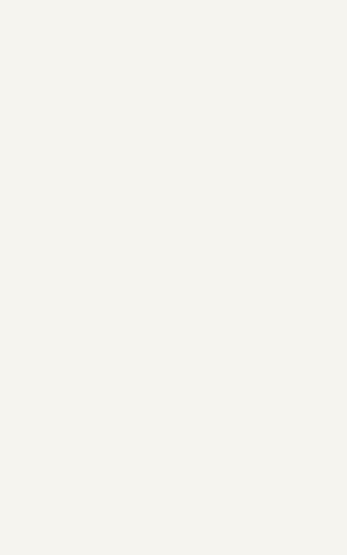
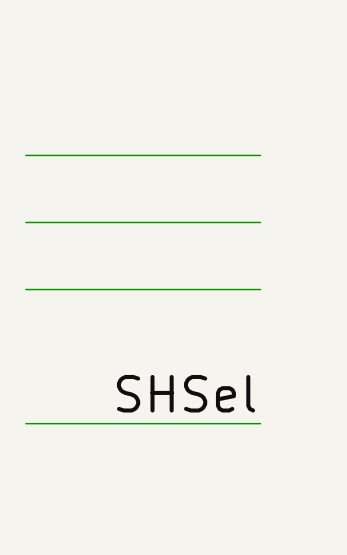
wire: none -> (25, 155) (260, 155)
wire: none -> (25, 222) (260, 222)
wire: none -> (25, 289) (260, 289)
label: none -> SHSel (186, 393)
wire: none -> (25, 423) (260, 423)

